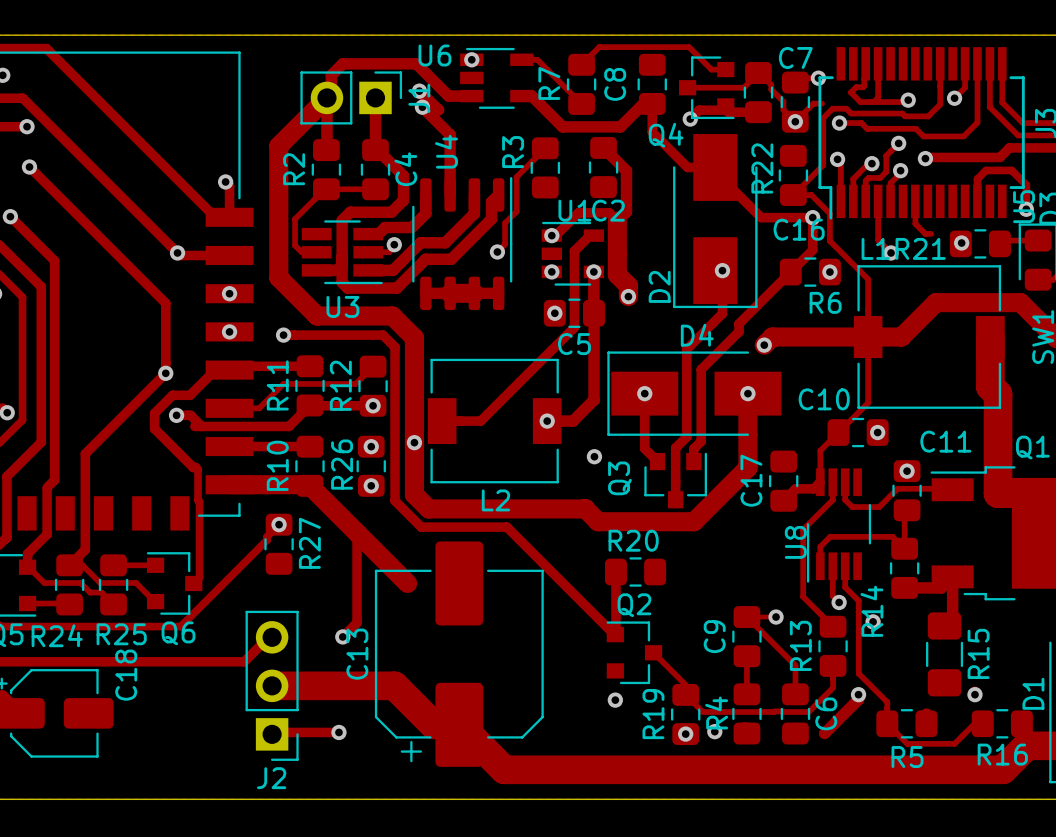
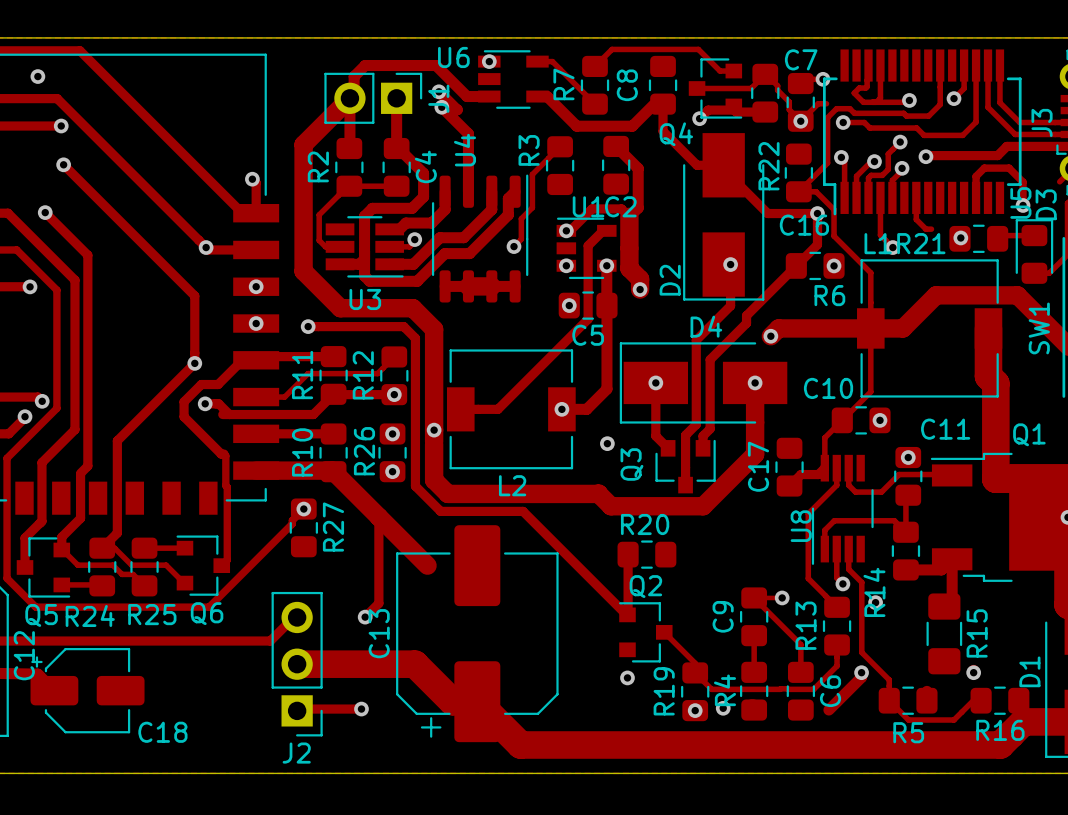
C18 name rotation: 0° (126, 675) -> 90° clockwise (162, 732)
C18 name position: C18 (126, 675) -> C18 (162, 732)

